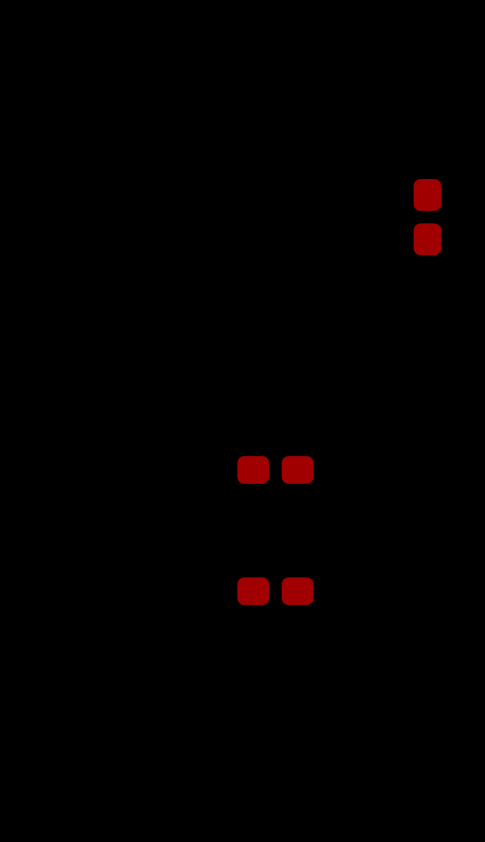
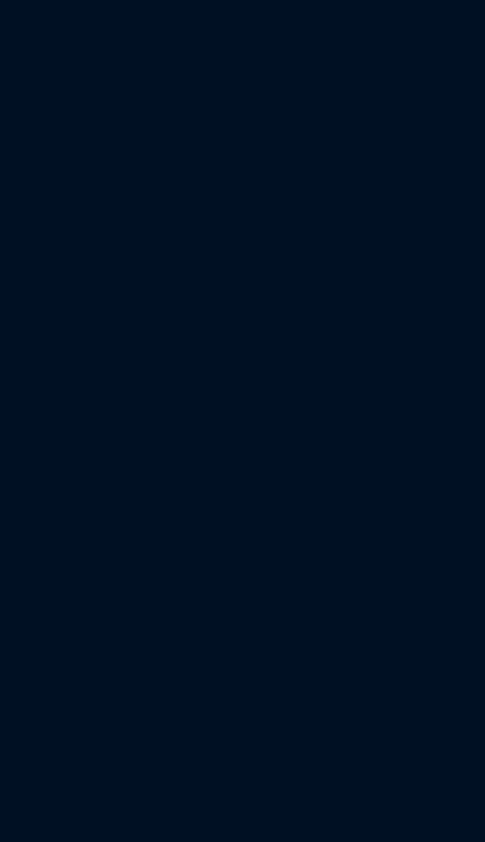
part: (427, 217) -> none
part: (275, 469) -> none
part: (275, 591) -> none

